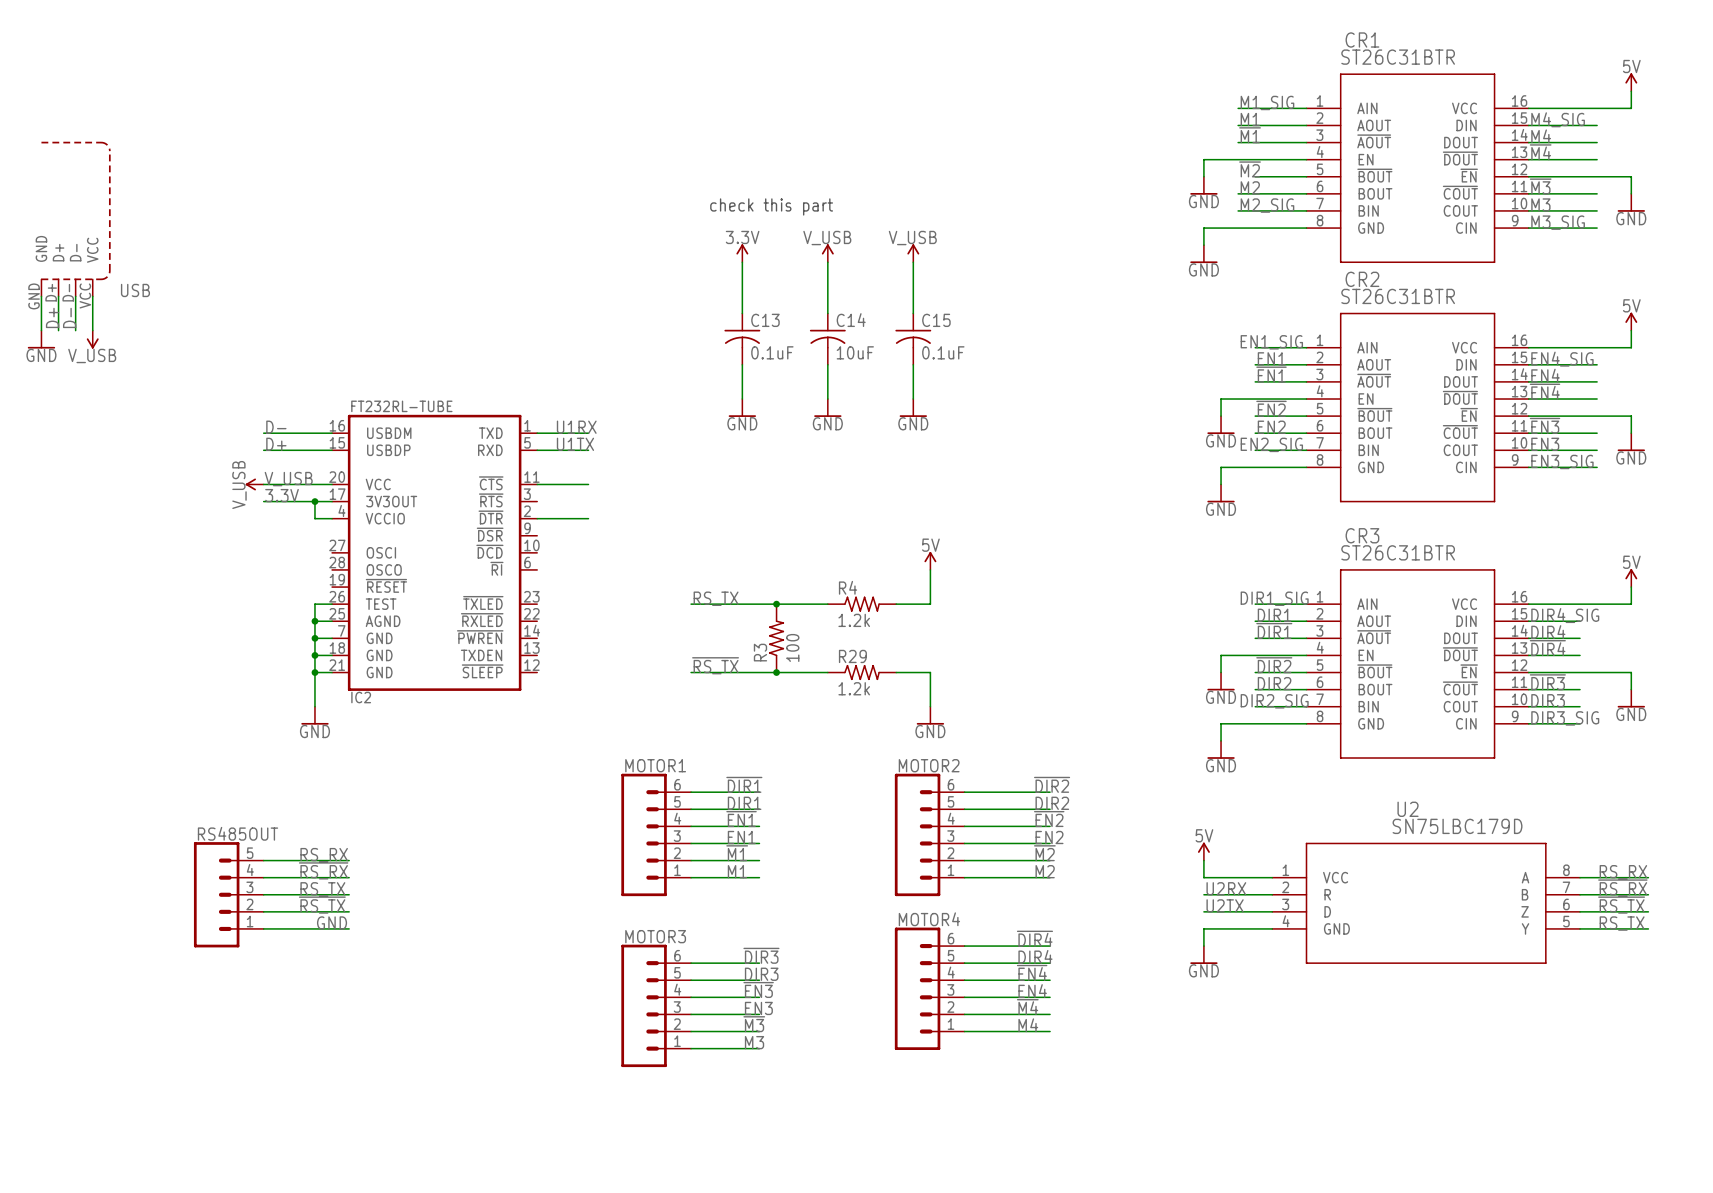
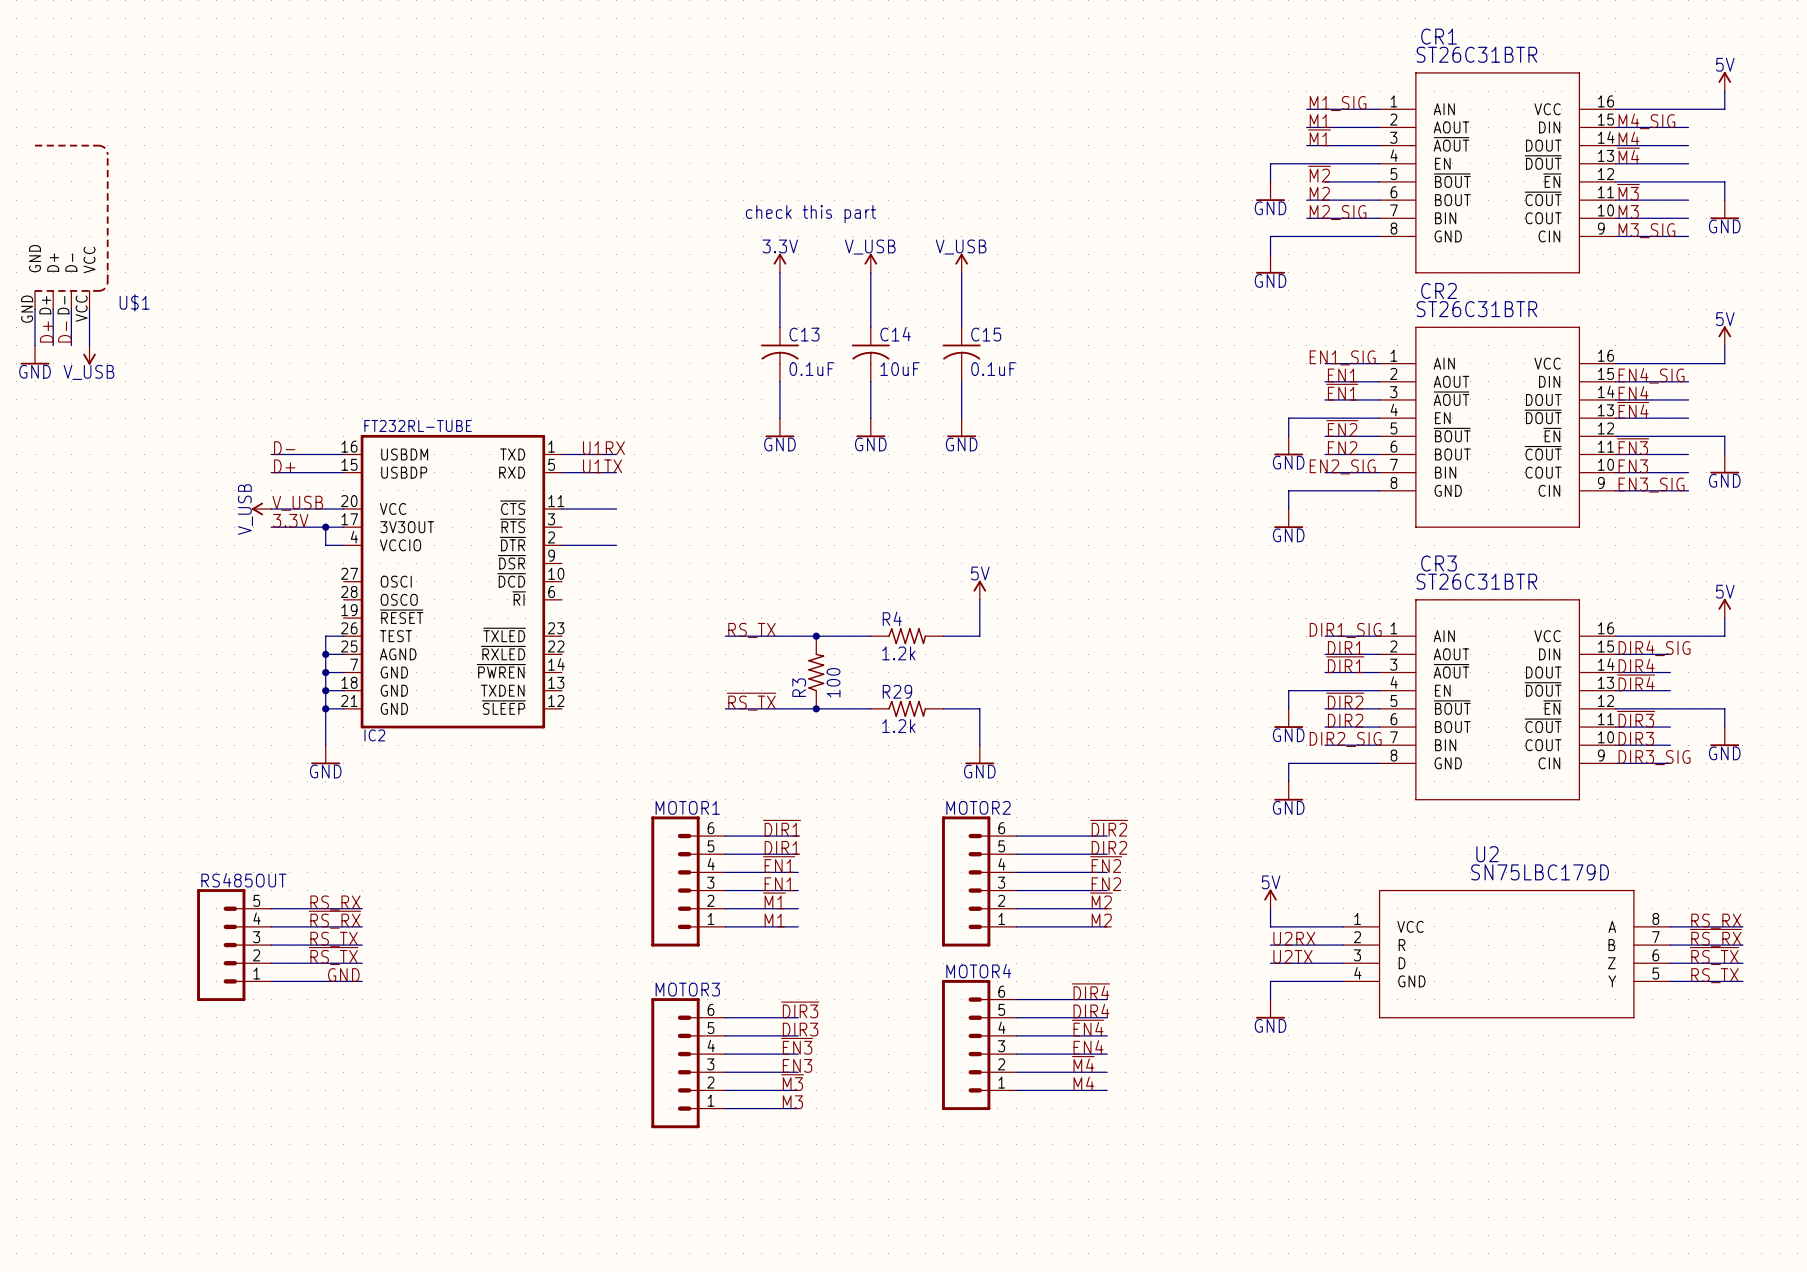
USB name: USB (135, 290) -> U$1 (134, 302)

